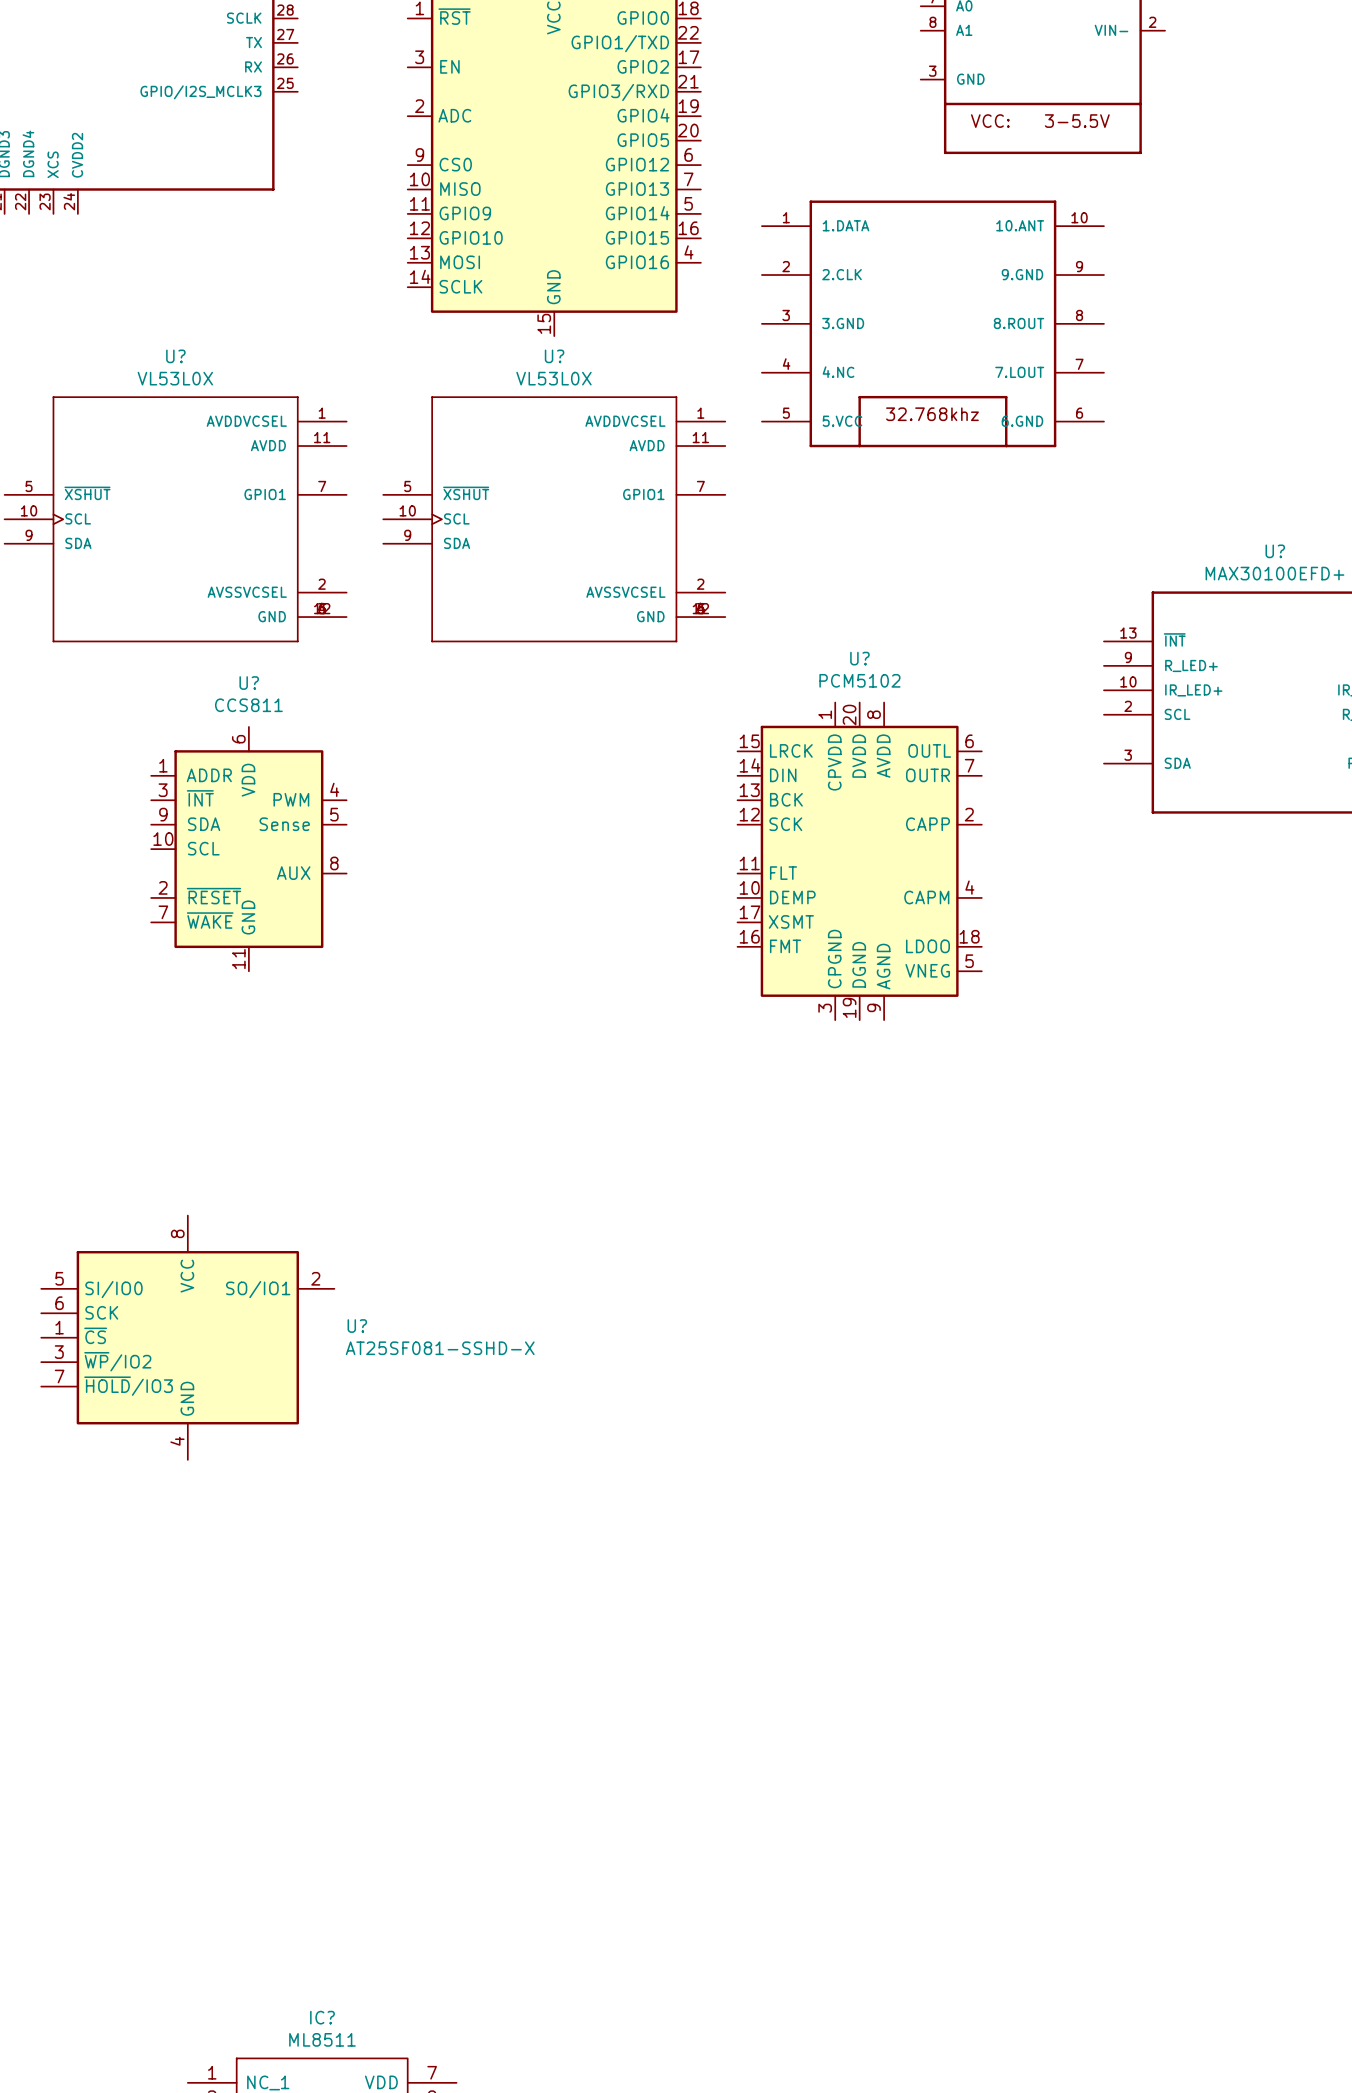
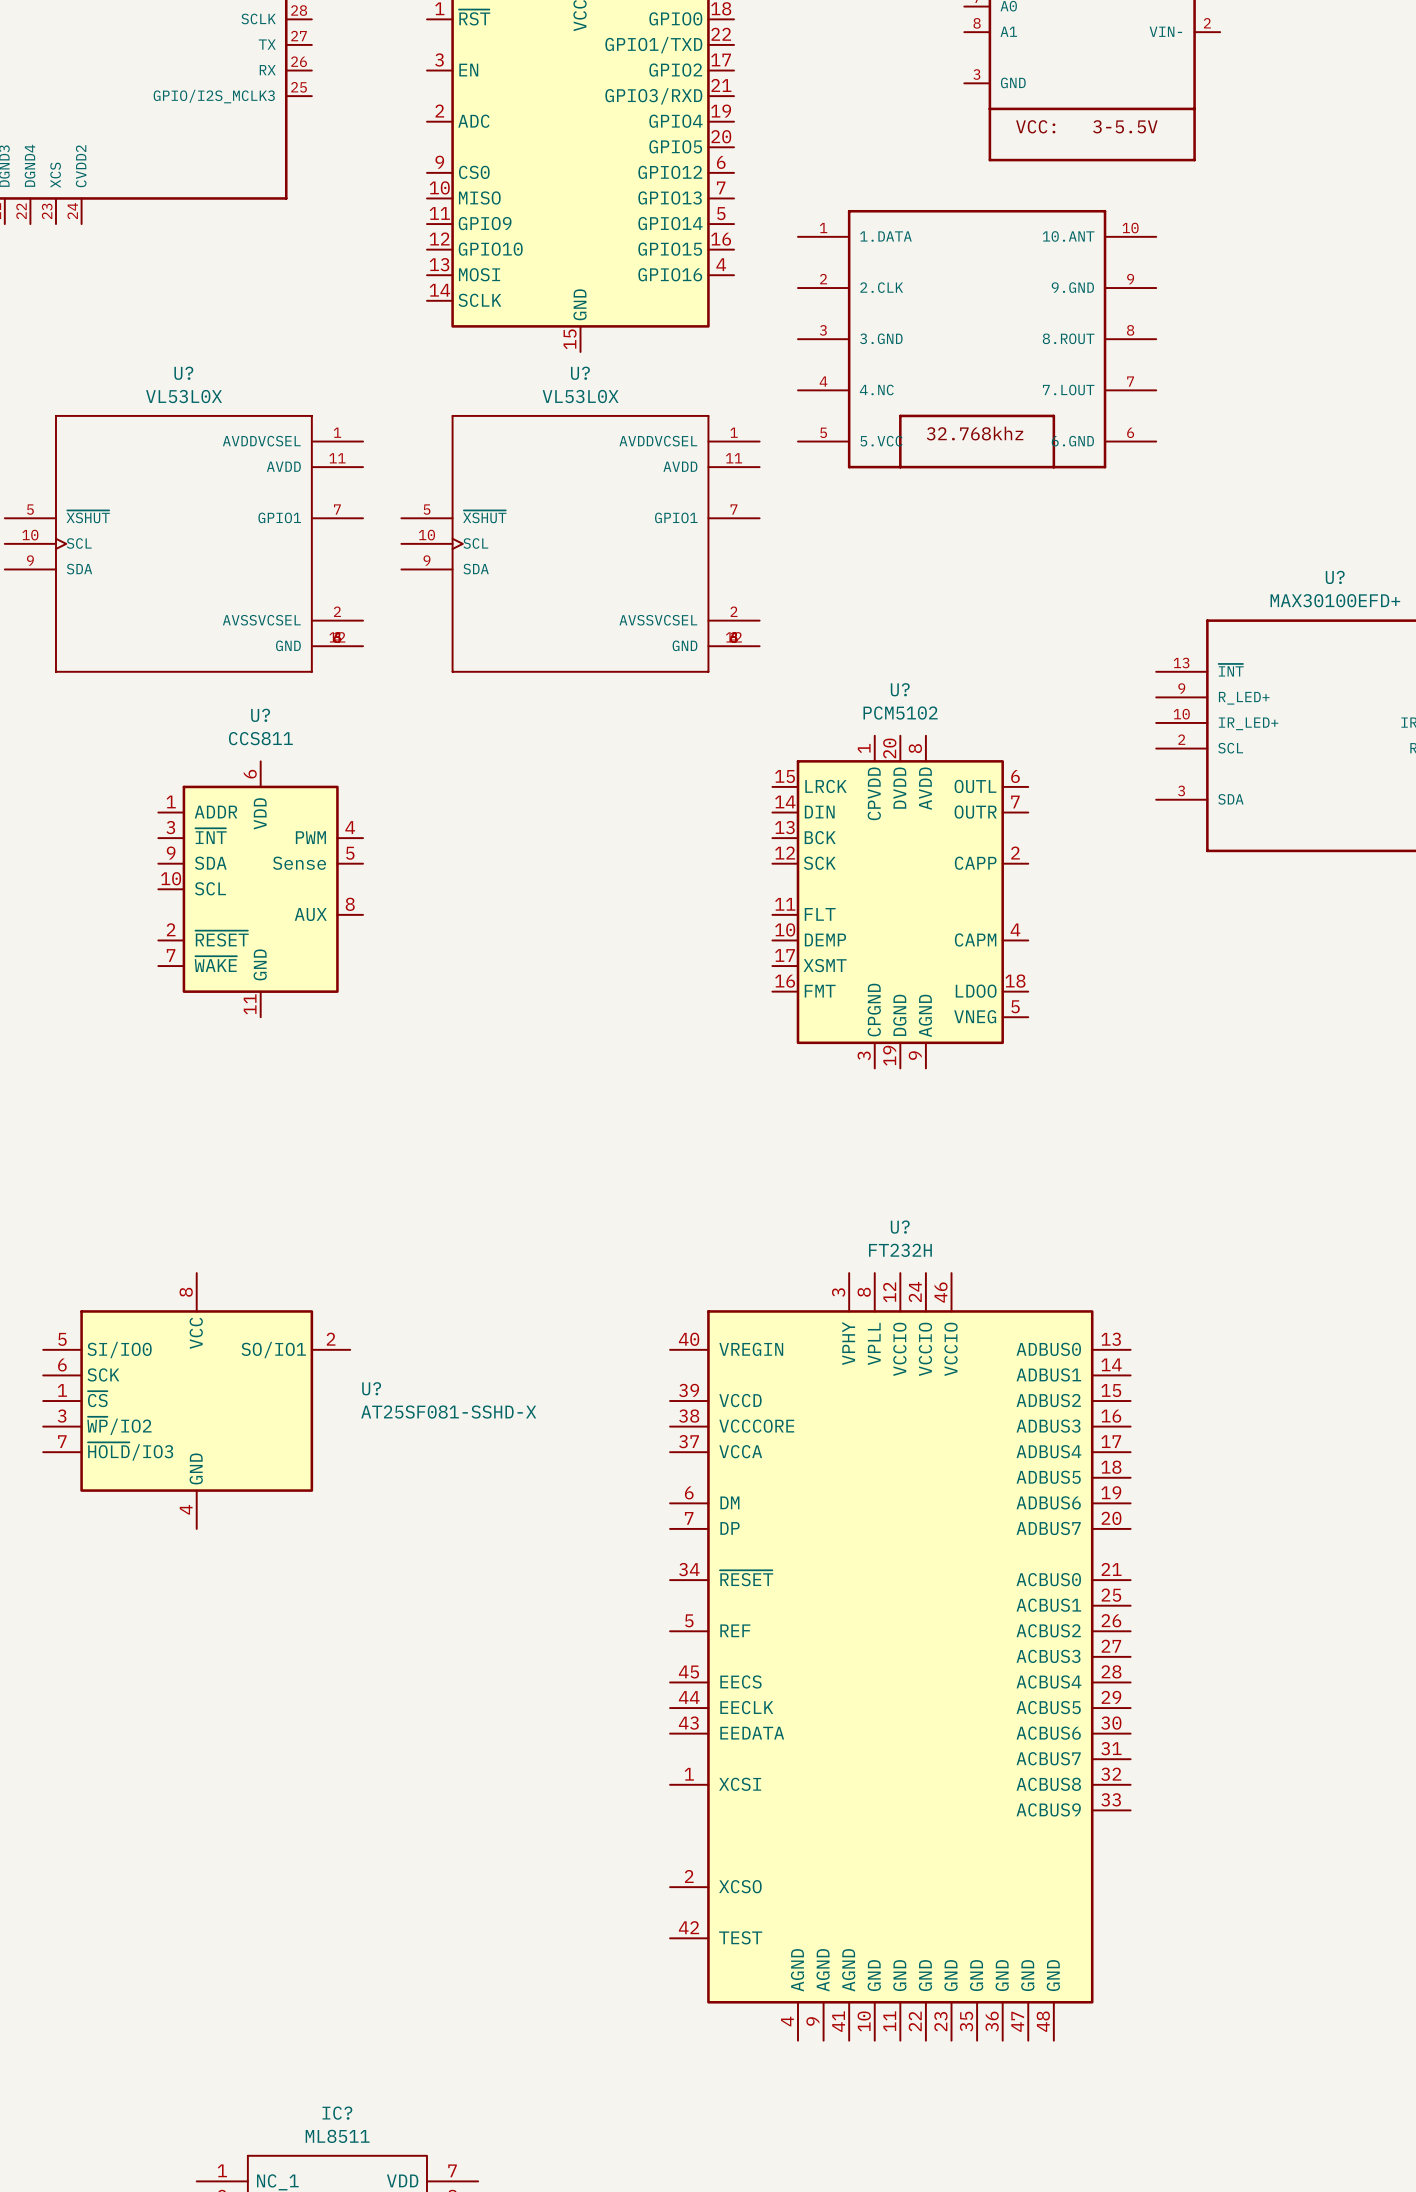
U?: none -> FT232H (900, 1656)

